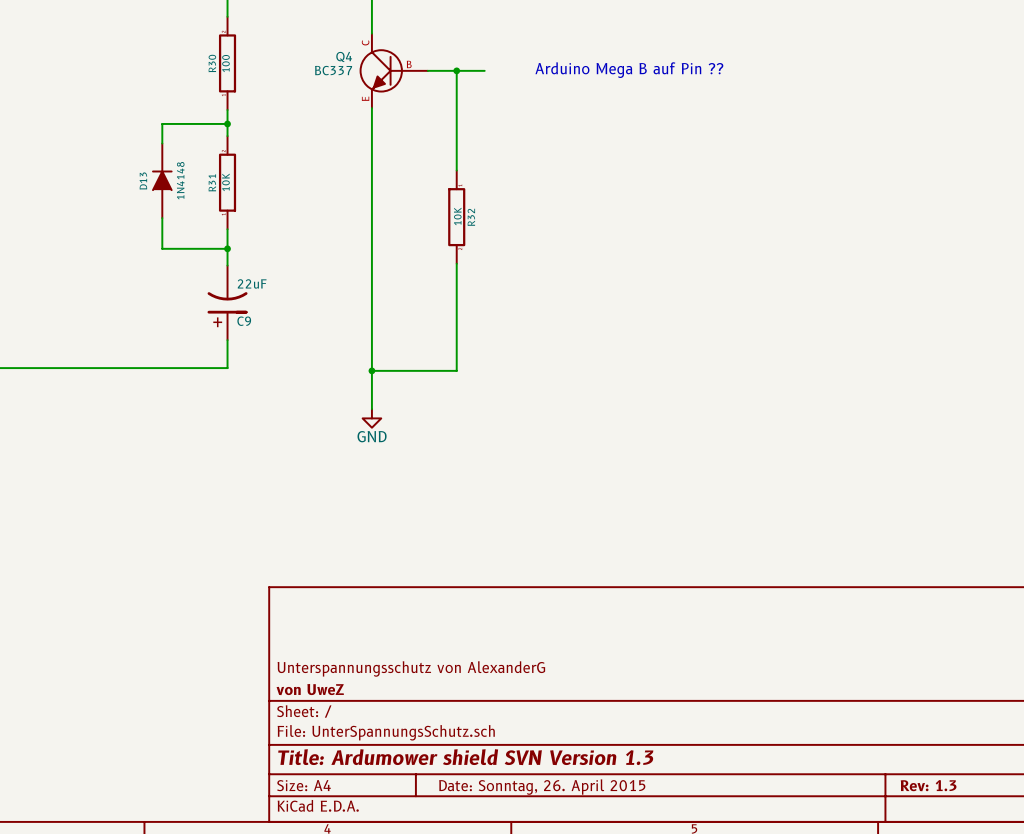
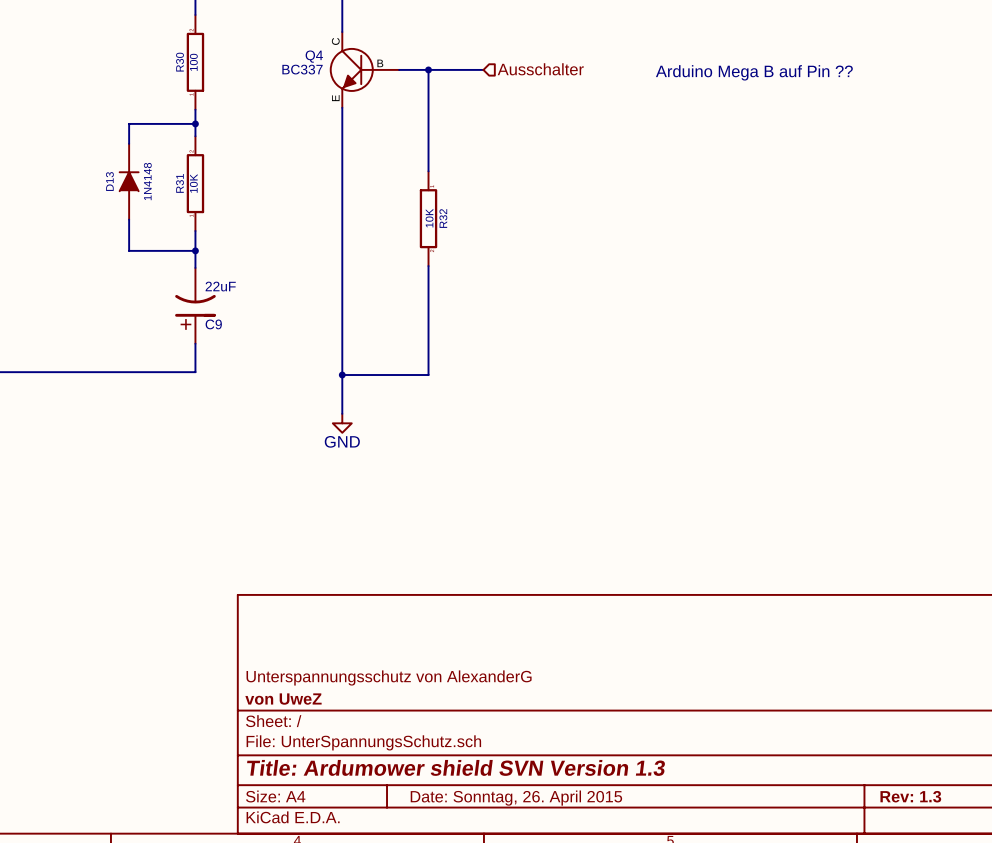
wire: none -> (456, 69) (483, 69)
hierarchical label: none -> Ausschalter (540, 69)
text position: Arduino Mega B auf Pin ?? (629, 70) -> Arduino Mega B auf Pin ?? (754, 72)

